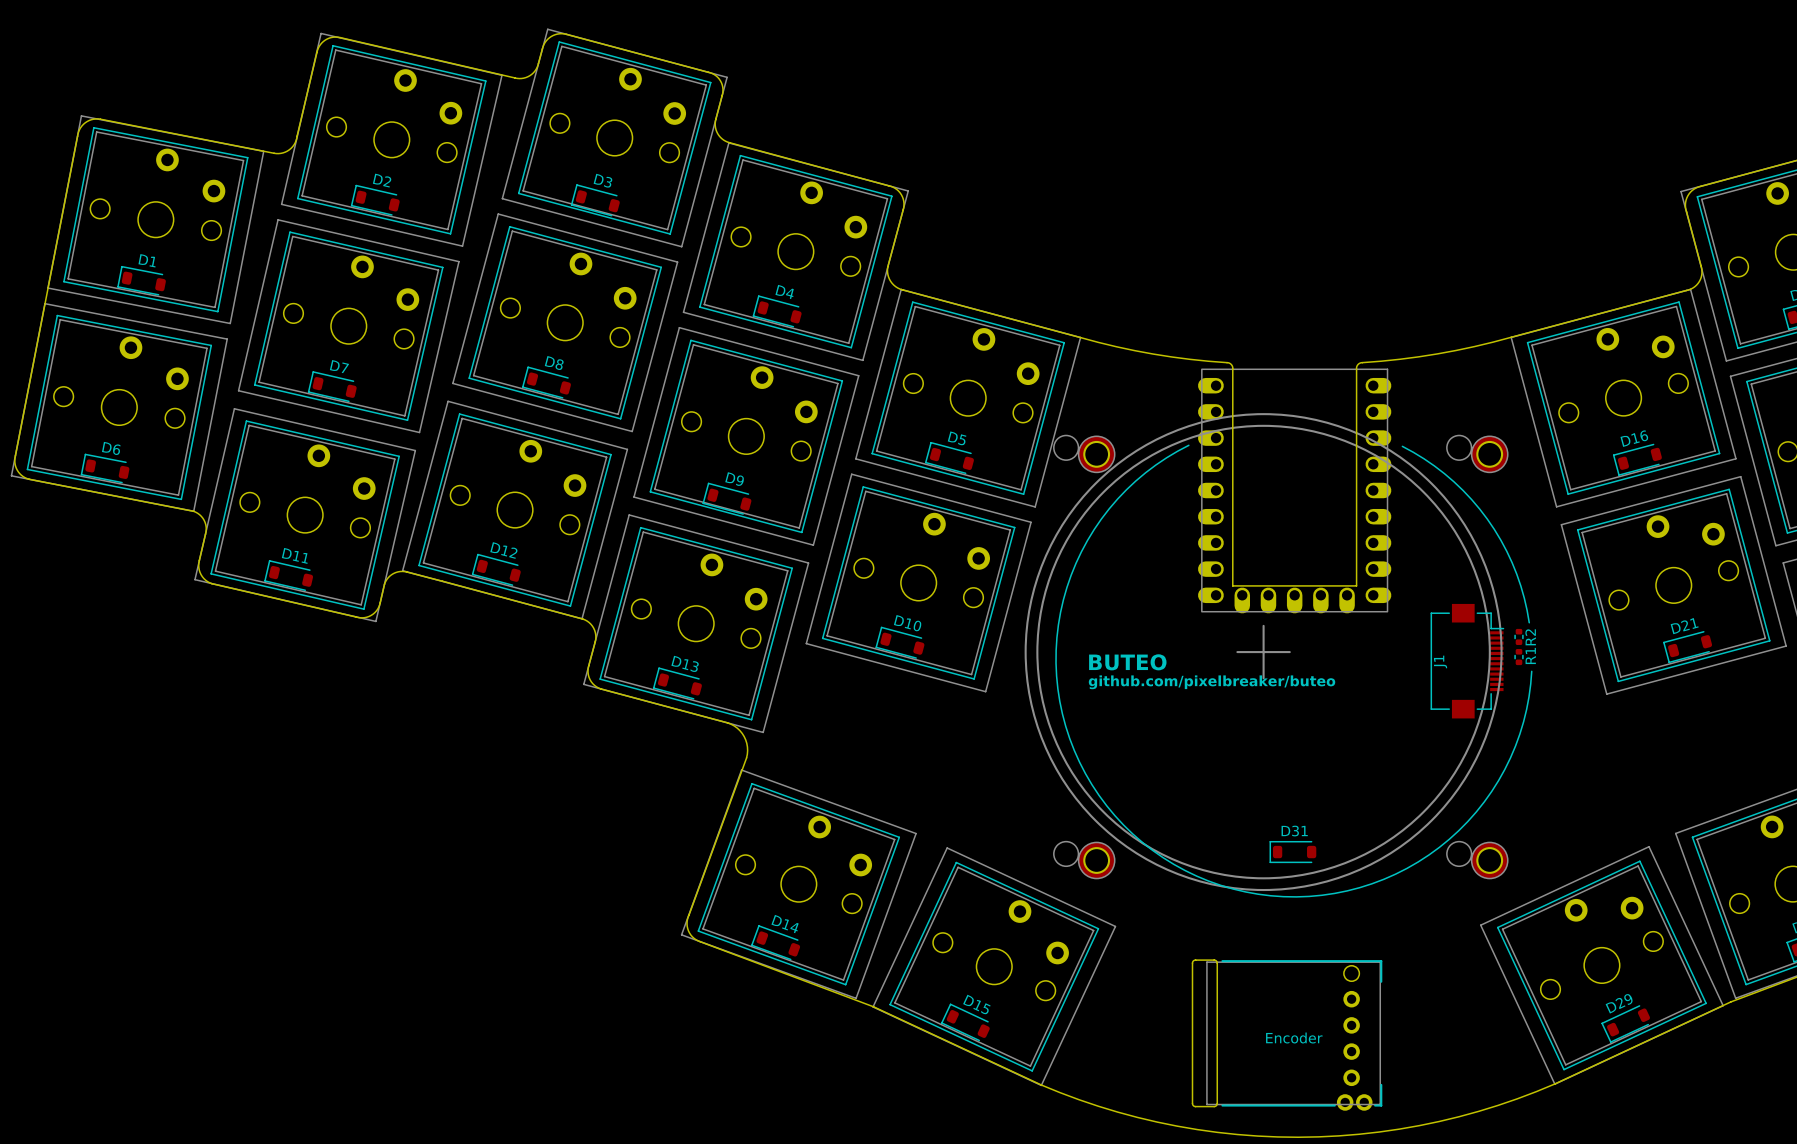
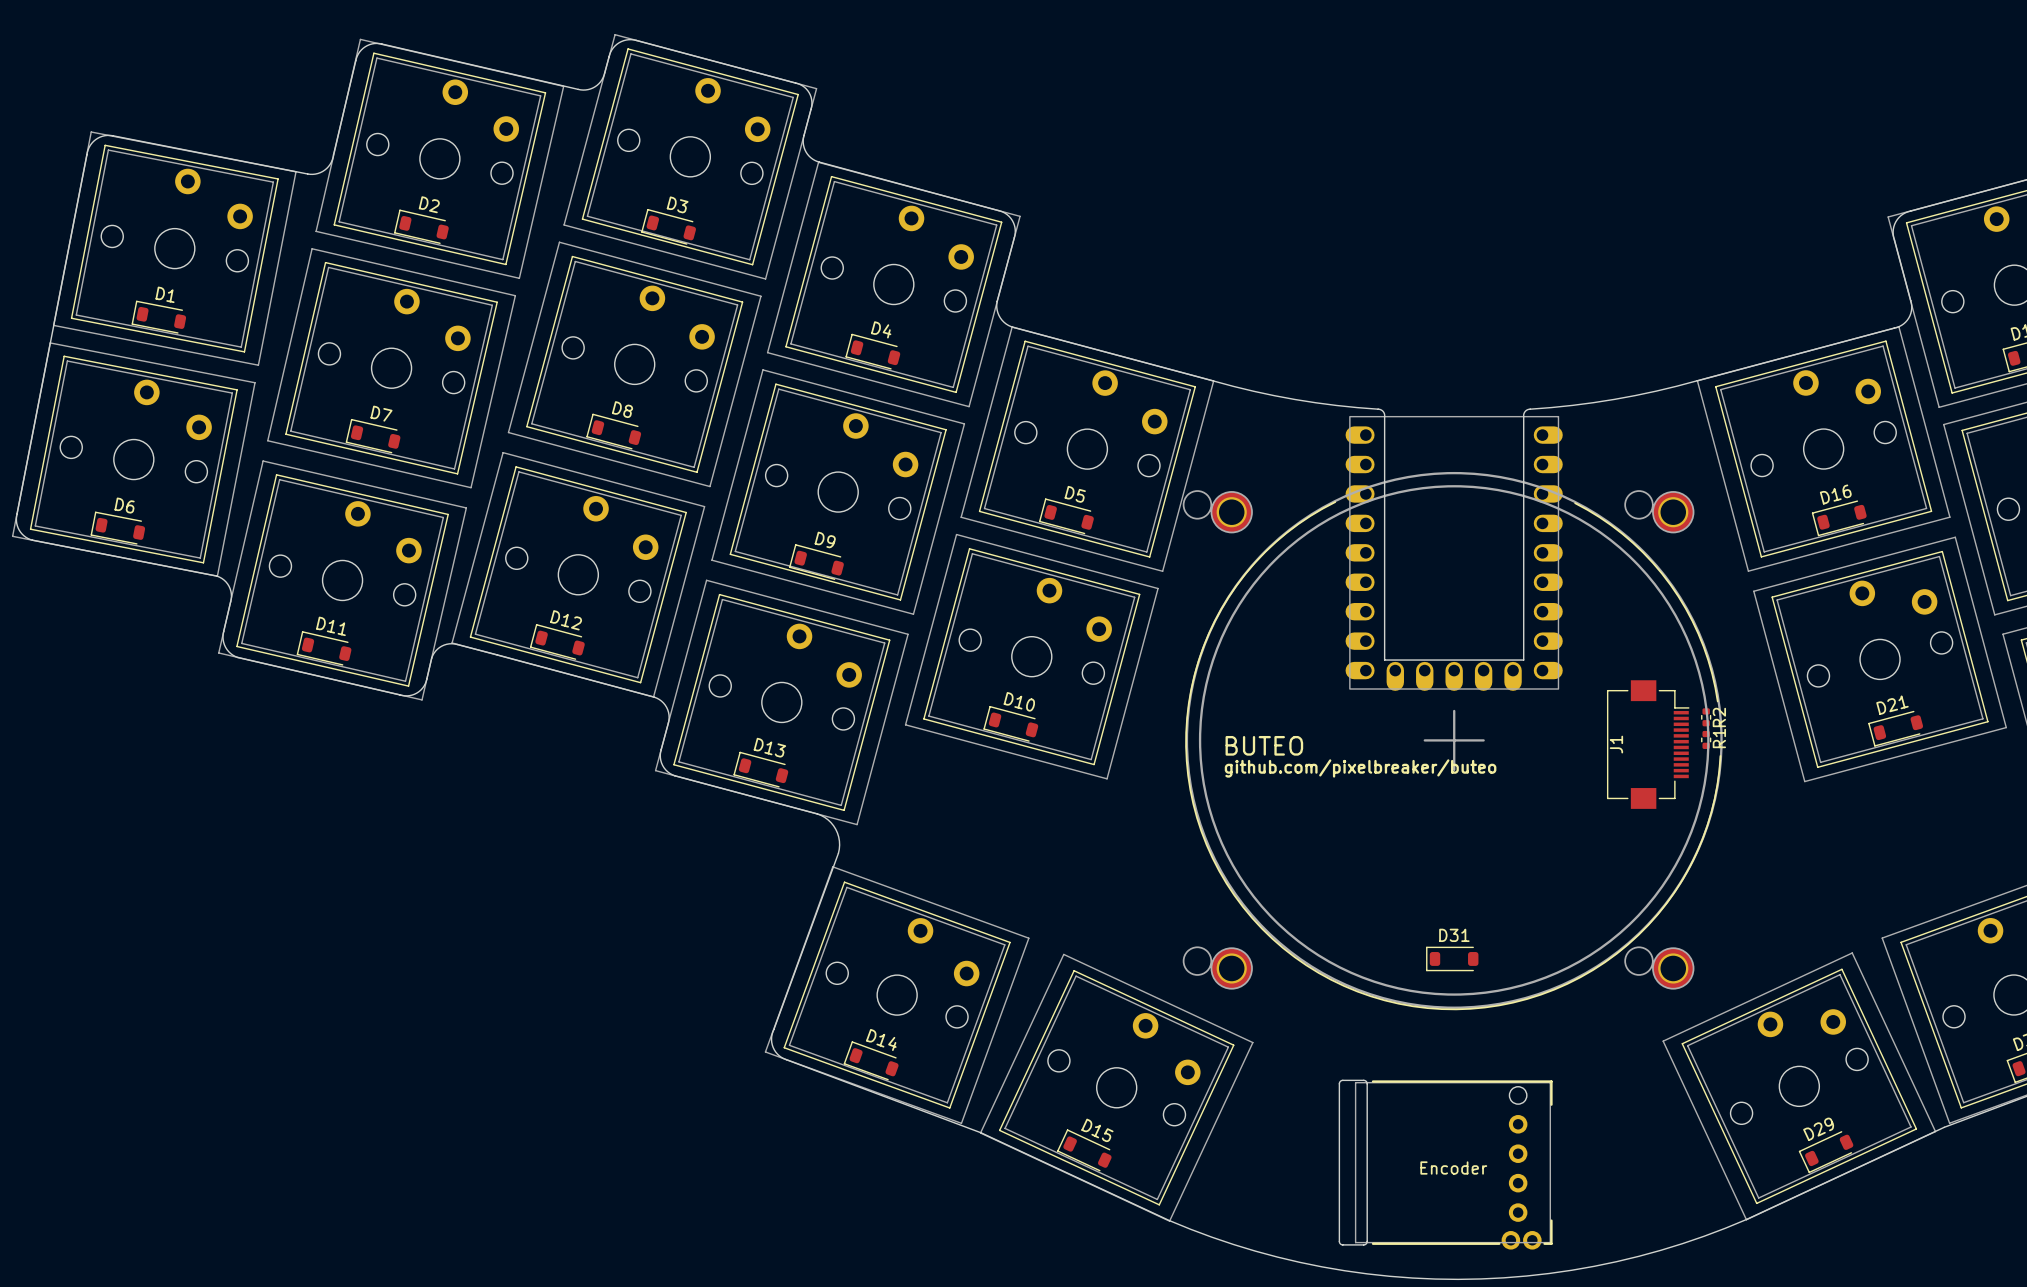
line: (1263, 625) (1263, 678) -> (1454, 710) (1454, 769)
line: (1237, 652) (1289, 652) -> (1424, 740) (1483, 740)
drawing position: (1263, 652) -> (1454, 740)
drawing position: (1263, 652) -> (1454, 740)

